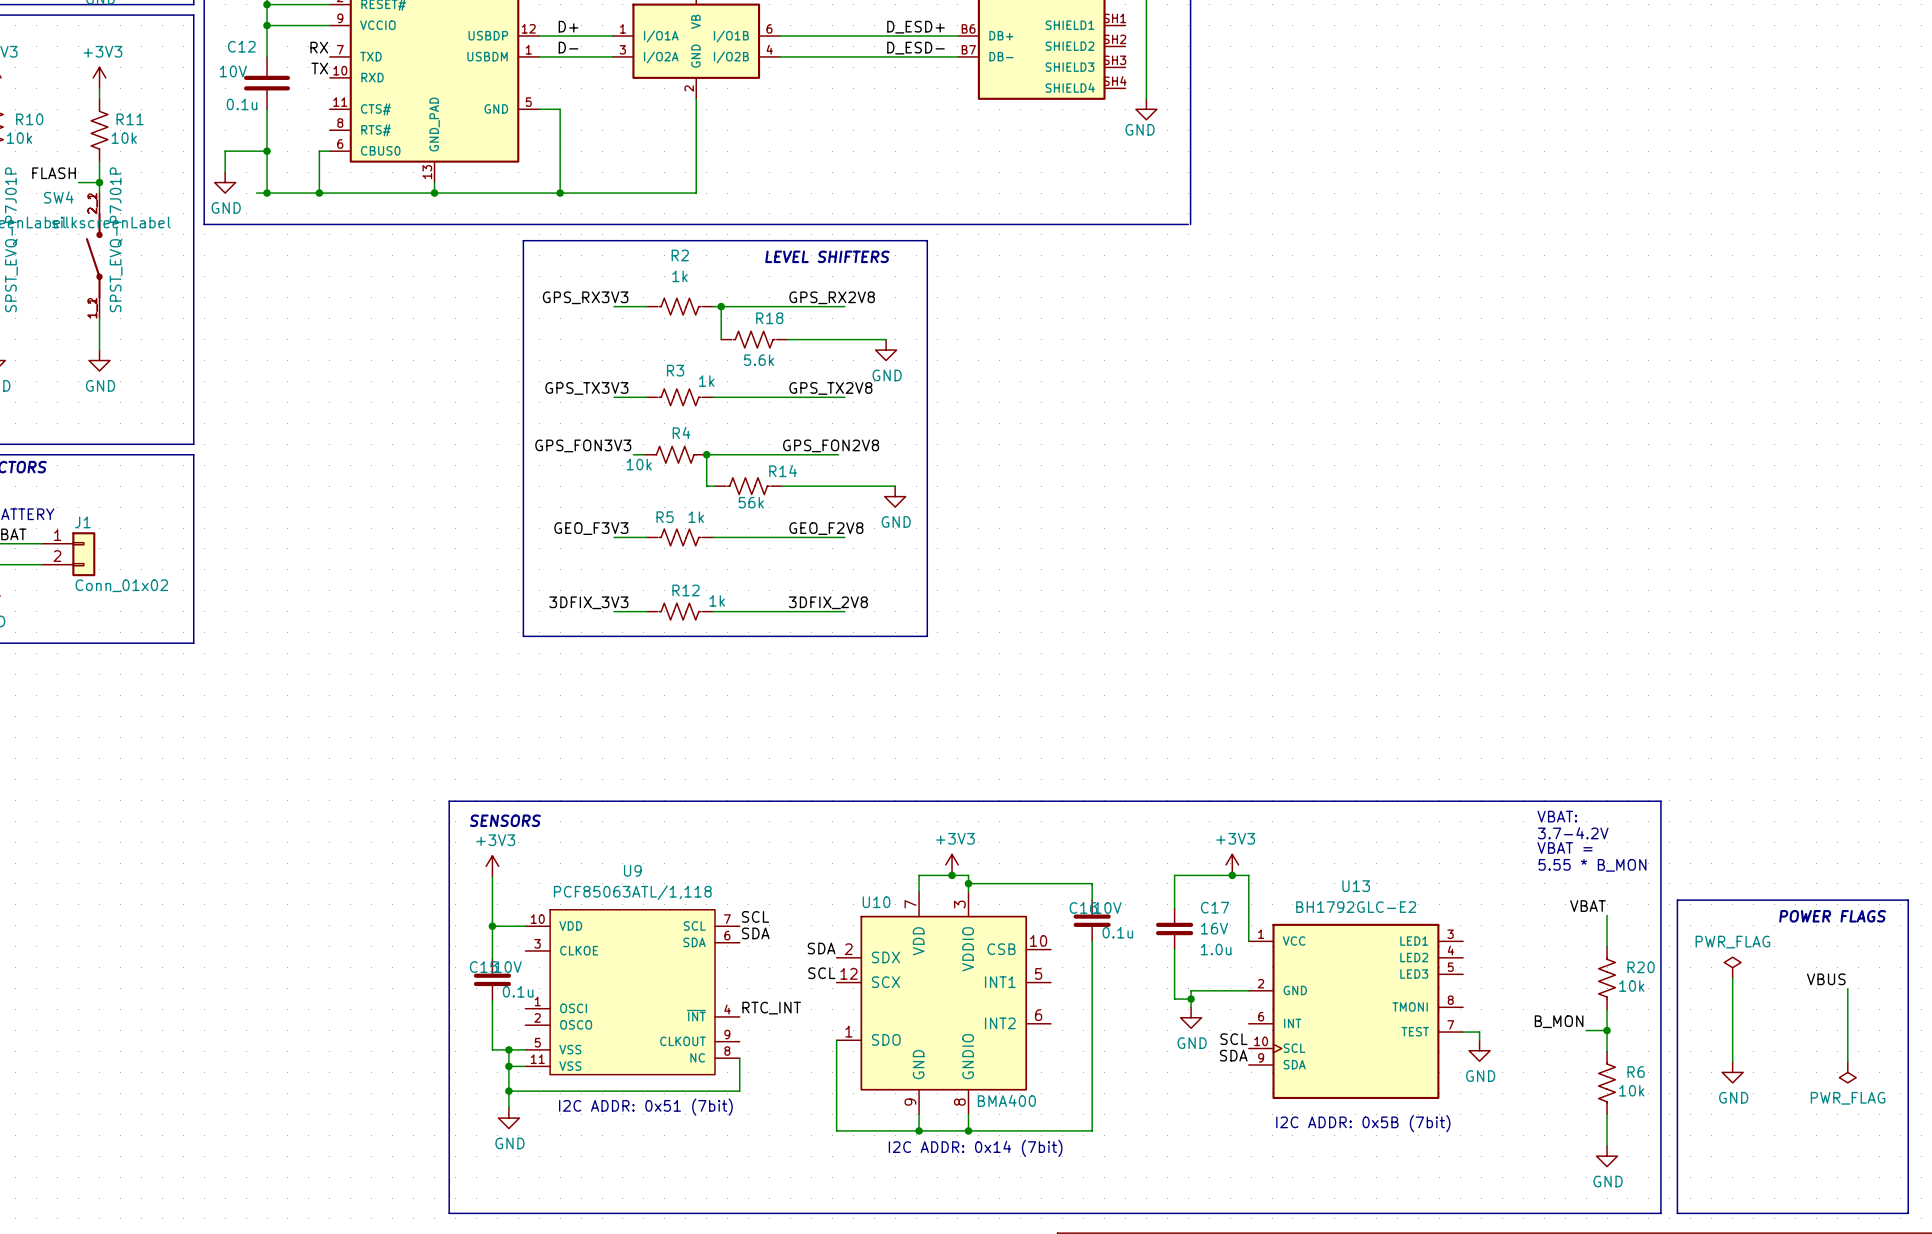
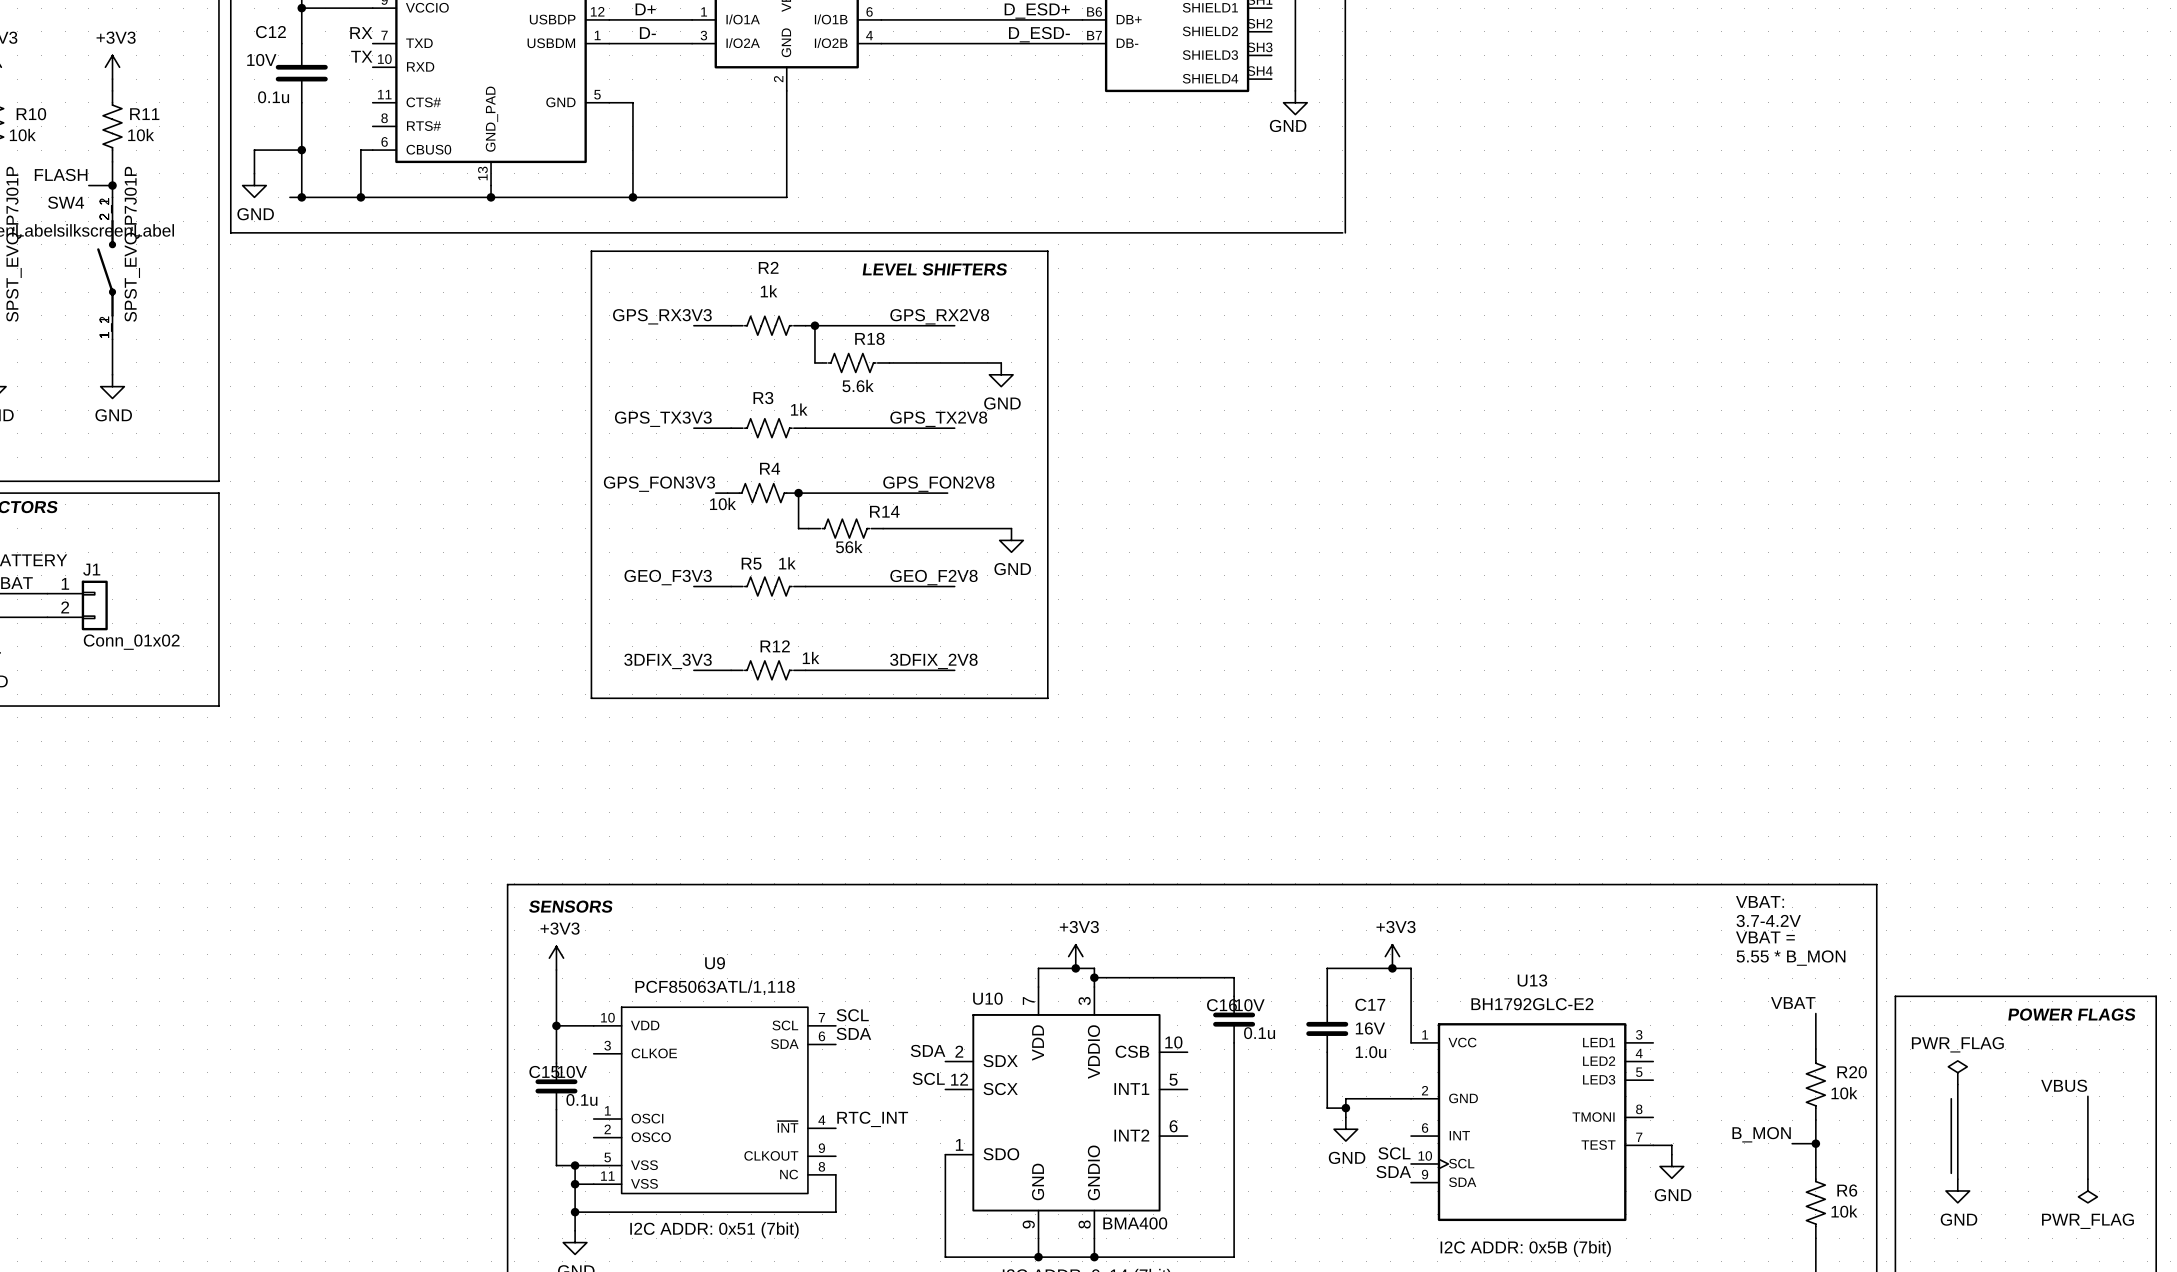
wire: none -> (1951, 1098) (1951, 1173)

